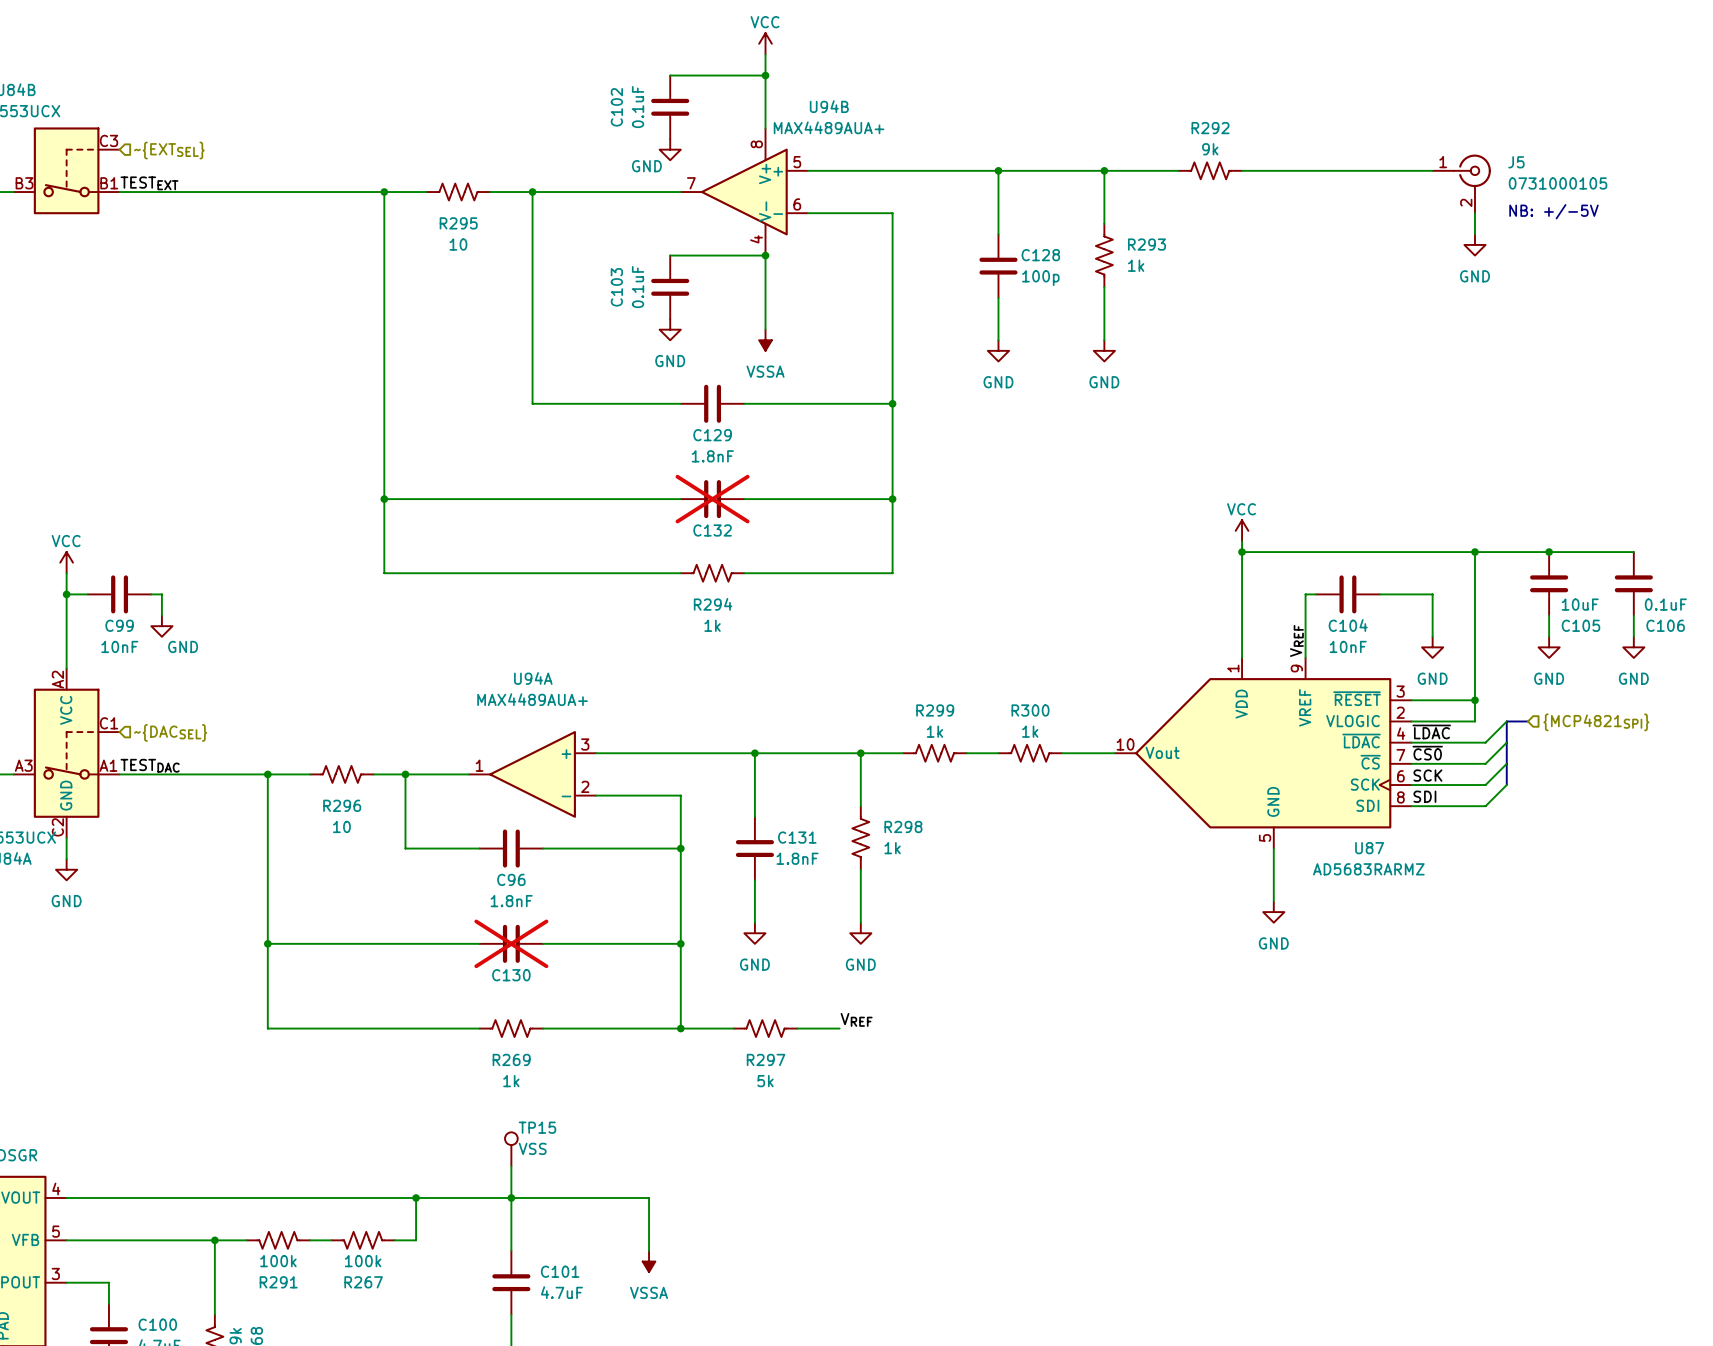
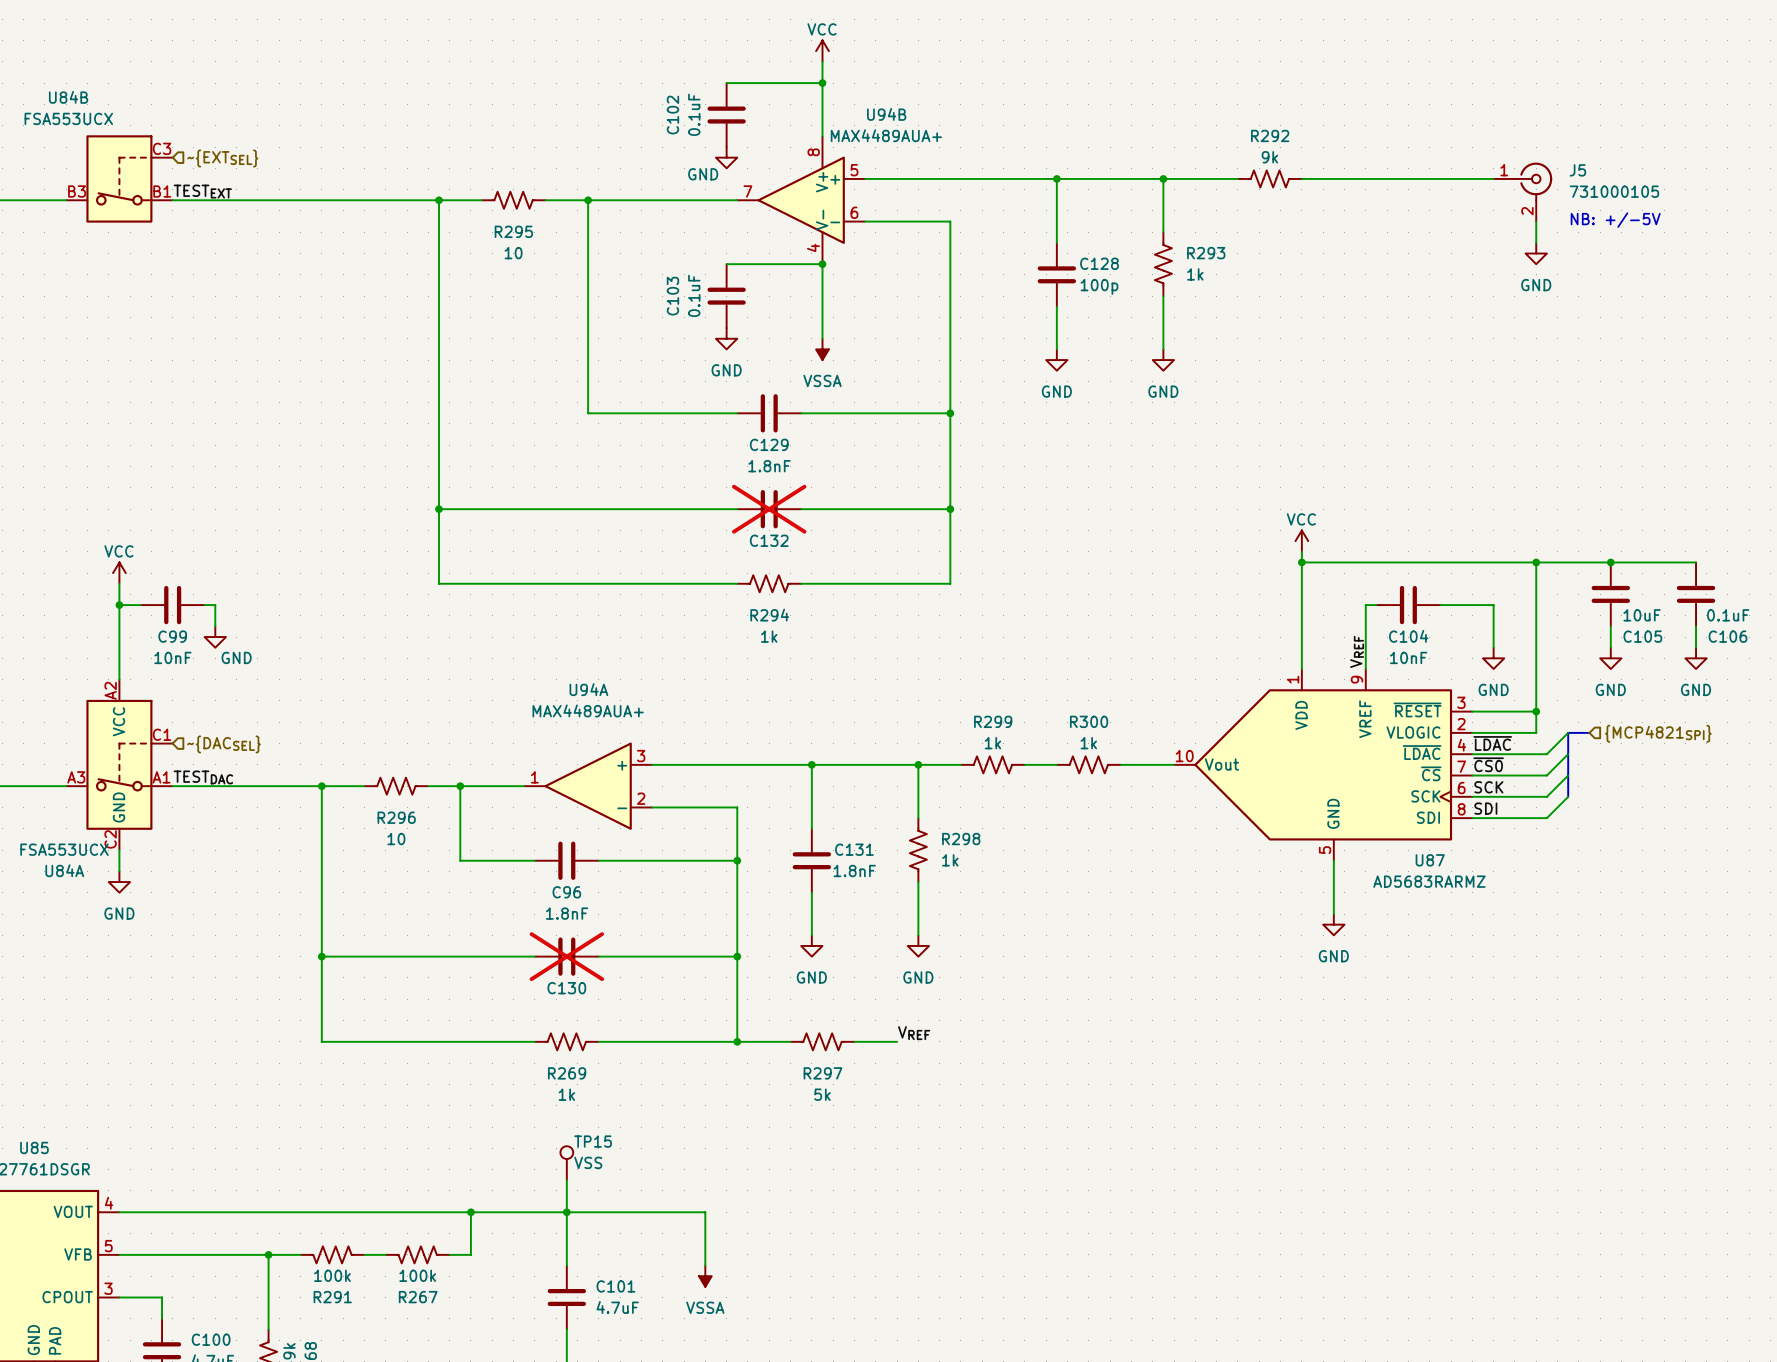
J5 value: 0731000105 (1558, 183) -> 731000105 (1614, 191)

